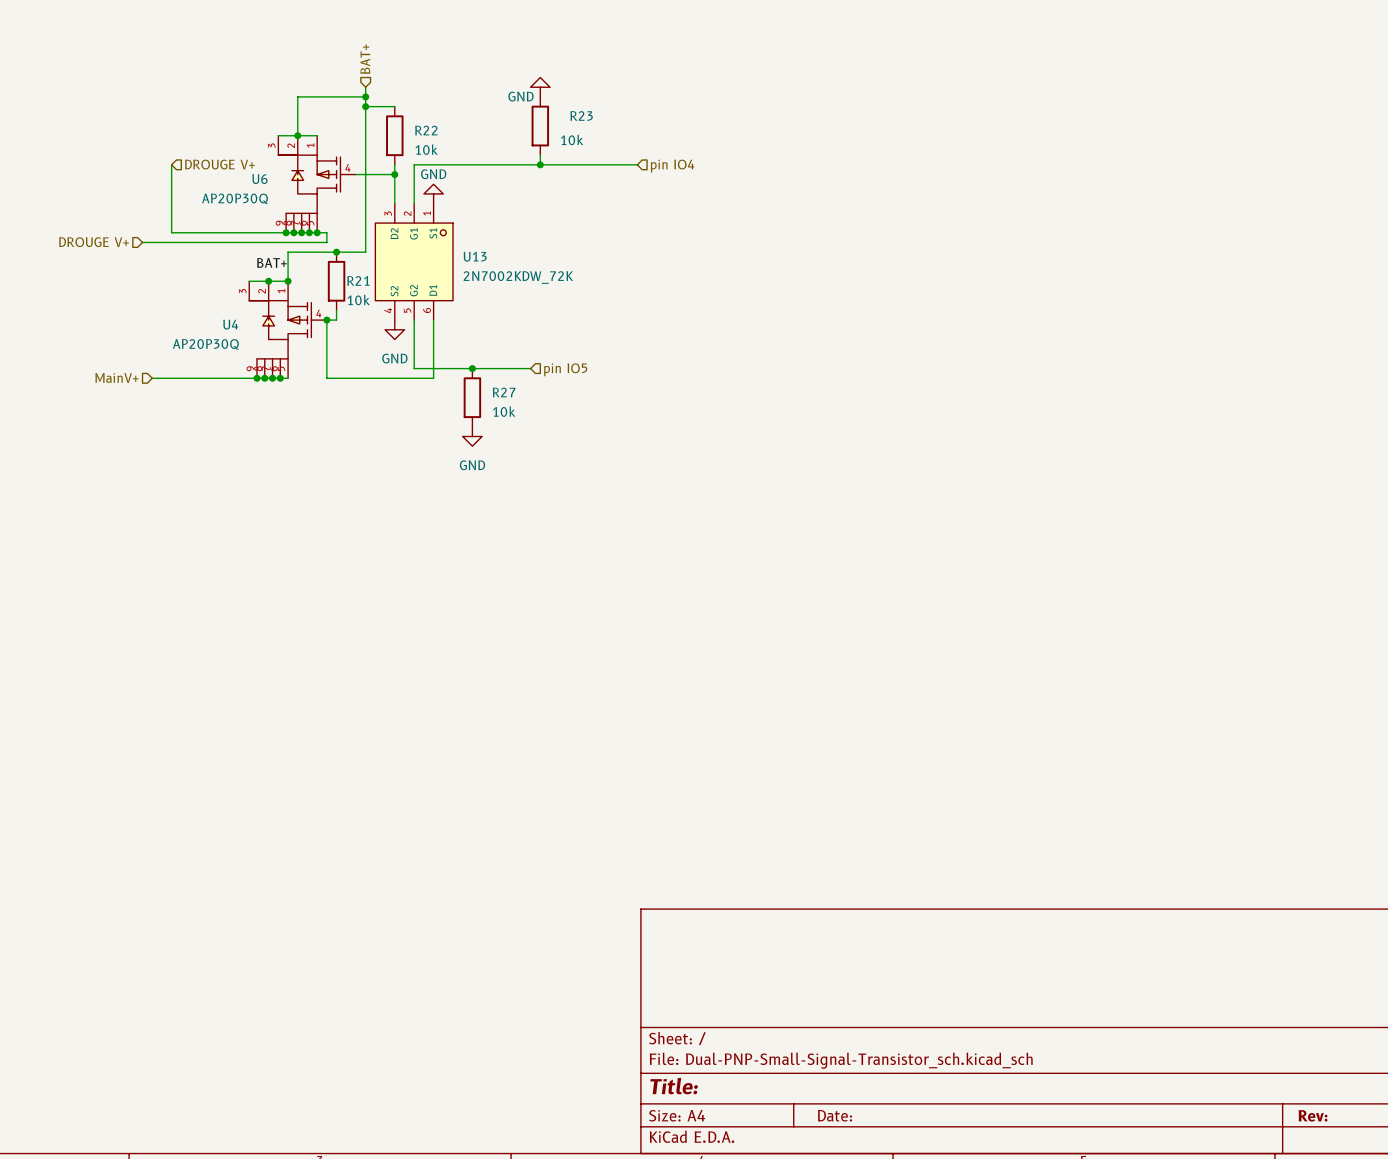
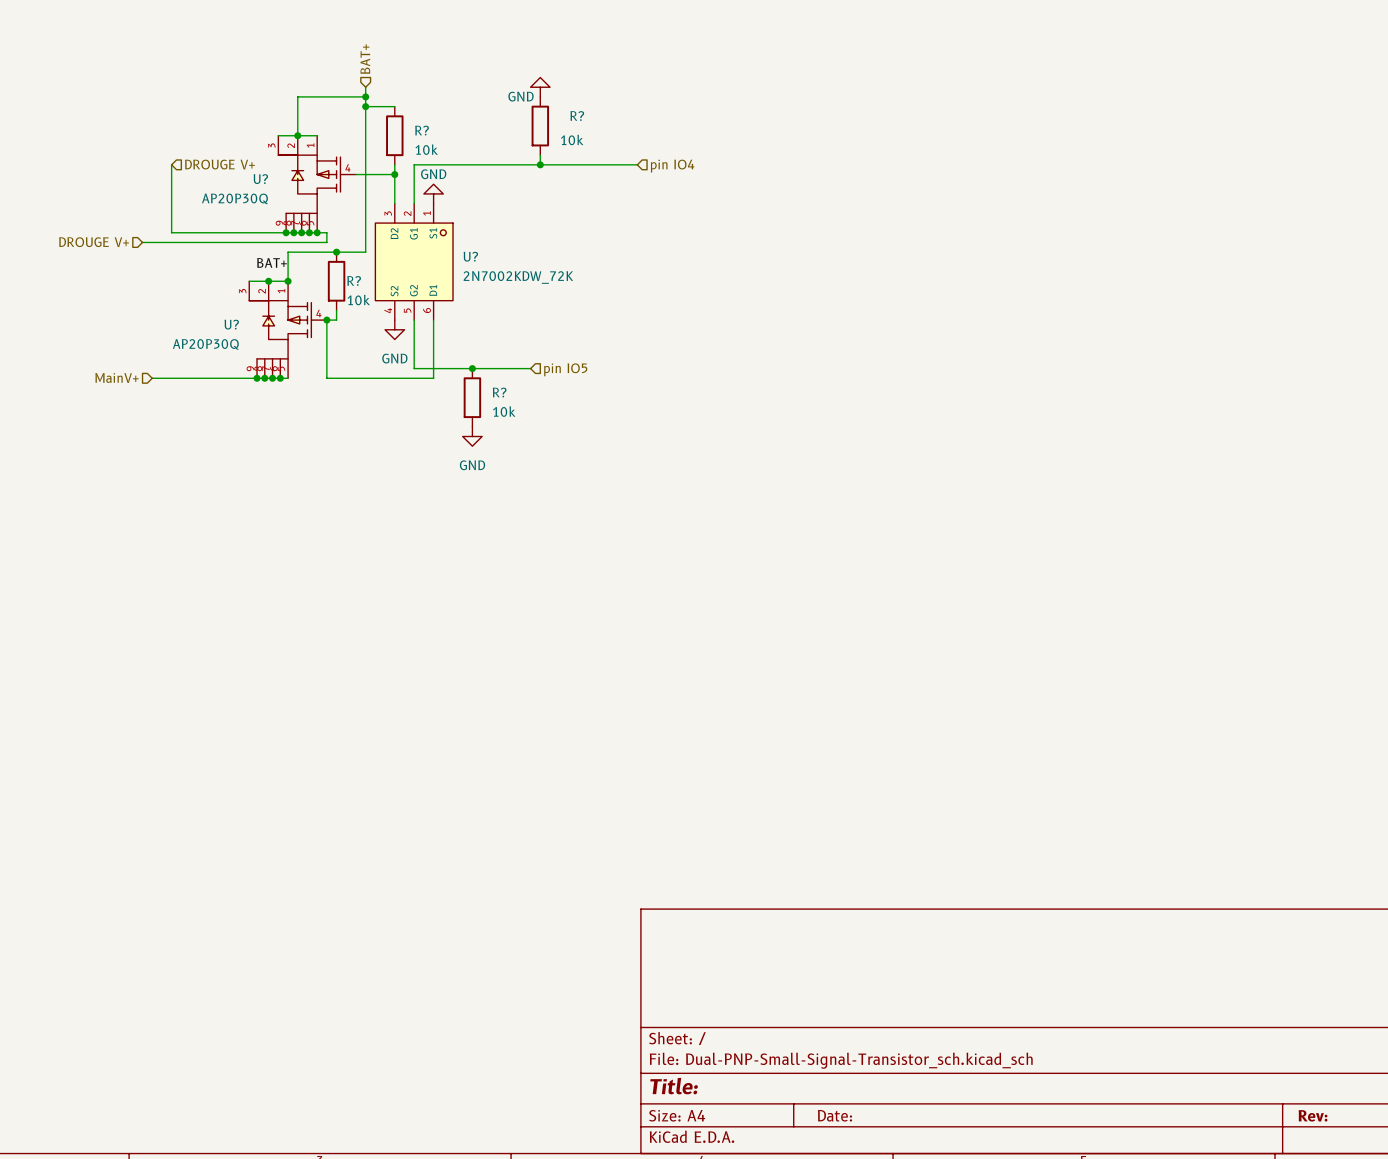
R23 name: R23 (581, 115) -> R? (577, 116)
R22 name: R22 (426, 130) -> R? (422, 130)
U6 name: U6 (259, 179) -> U? (260, 179)
U13 name: U13 (475, 256) -> U? (470, 256)
R21 name: R21 (358, 280) -> R? (354, 280)
U4 name: U4 (230, 324) -> U? (231, 324)
R27 name: R27 (504, 392) -> R? (499, 392)

